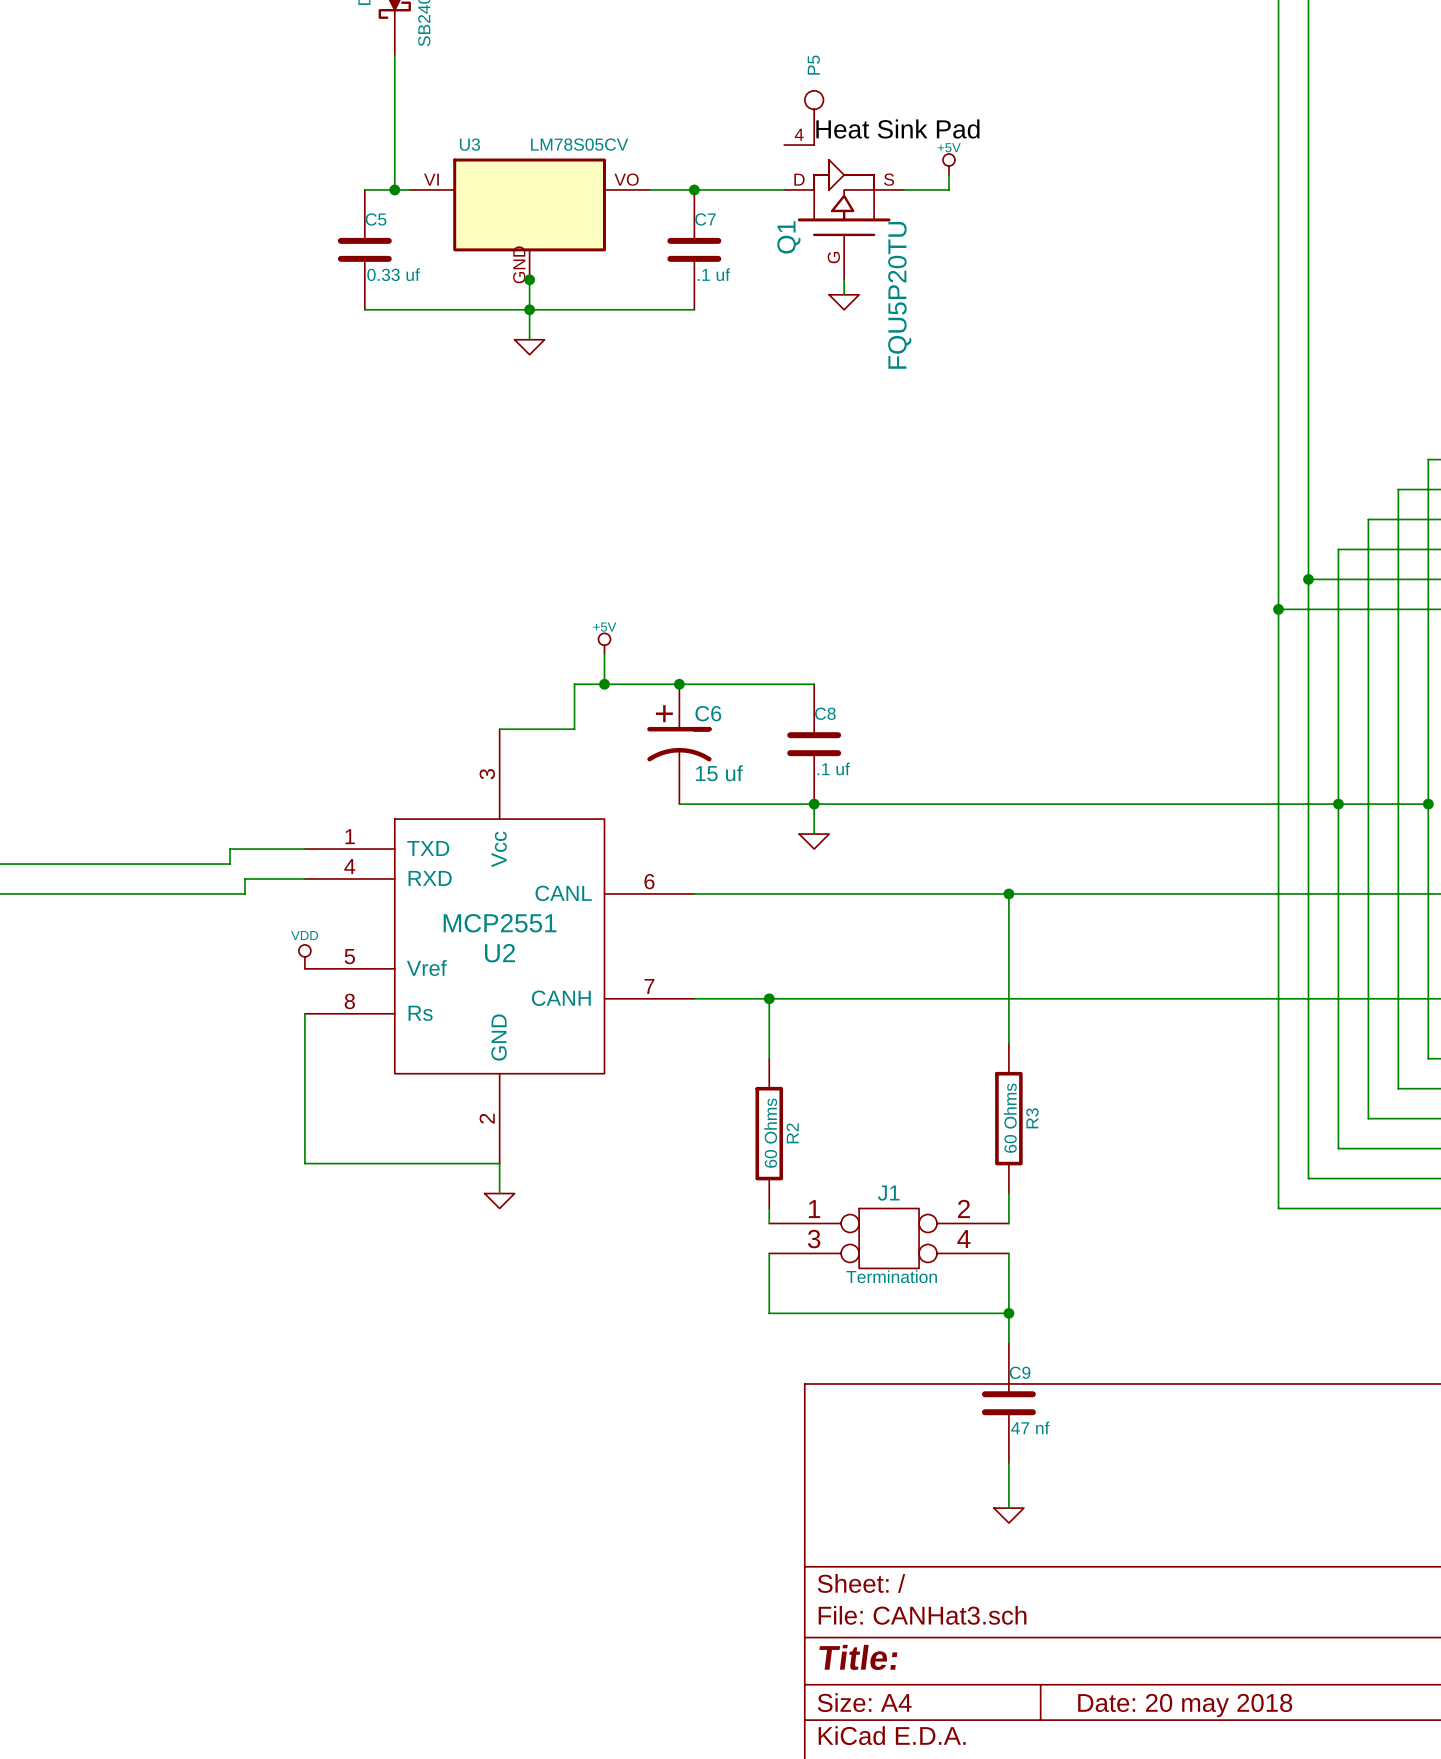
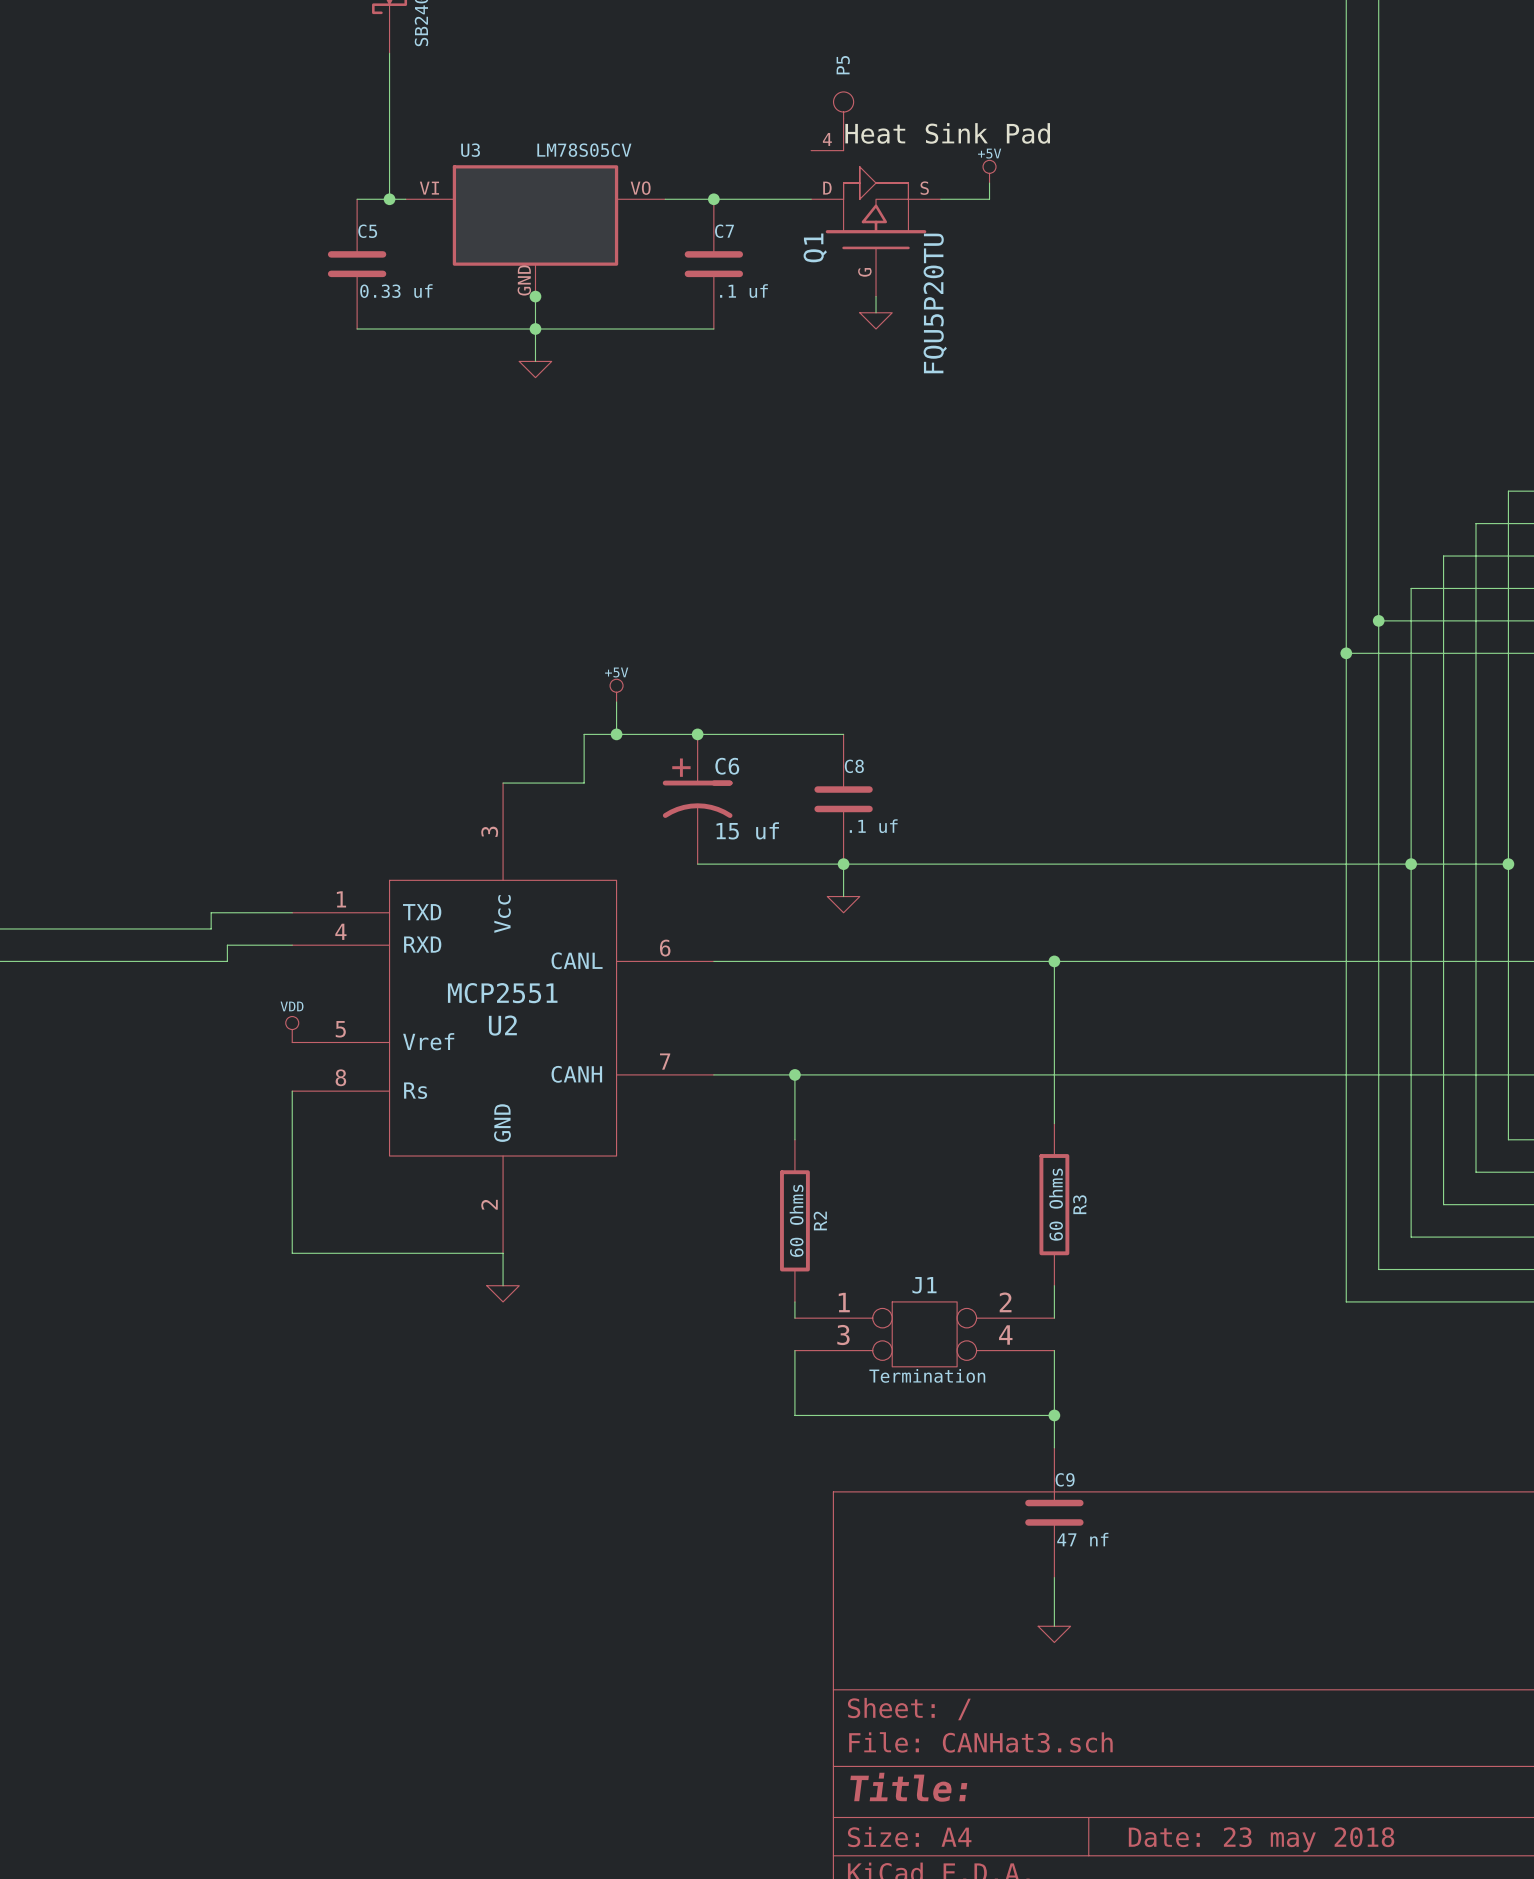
title block: Date: 20 may 2018 (1185, 1705) -> Date: 23 may 2018 (1261, 1839)

